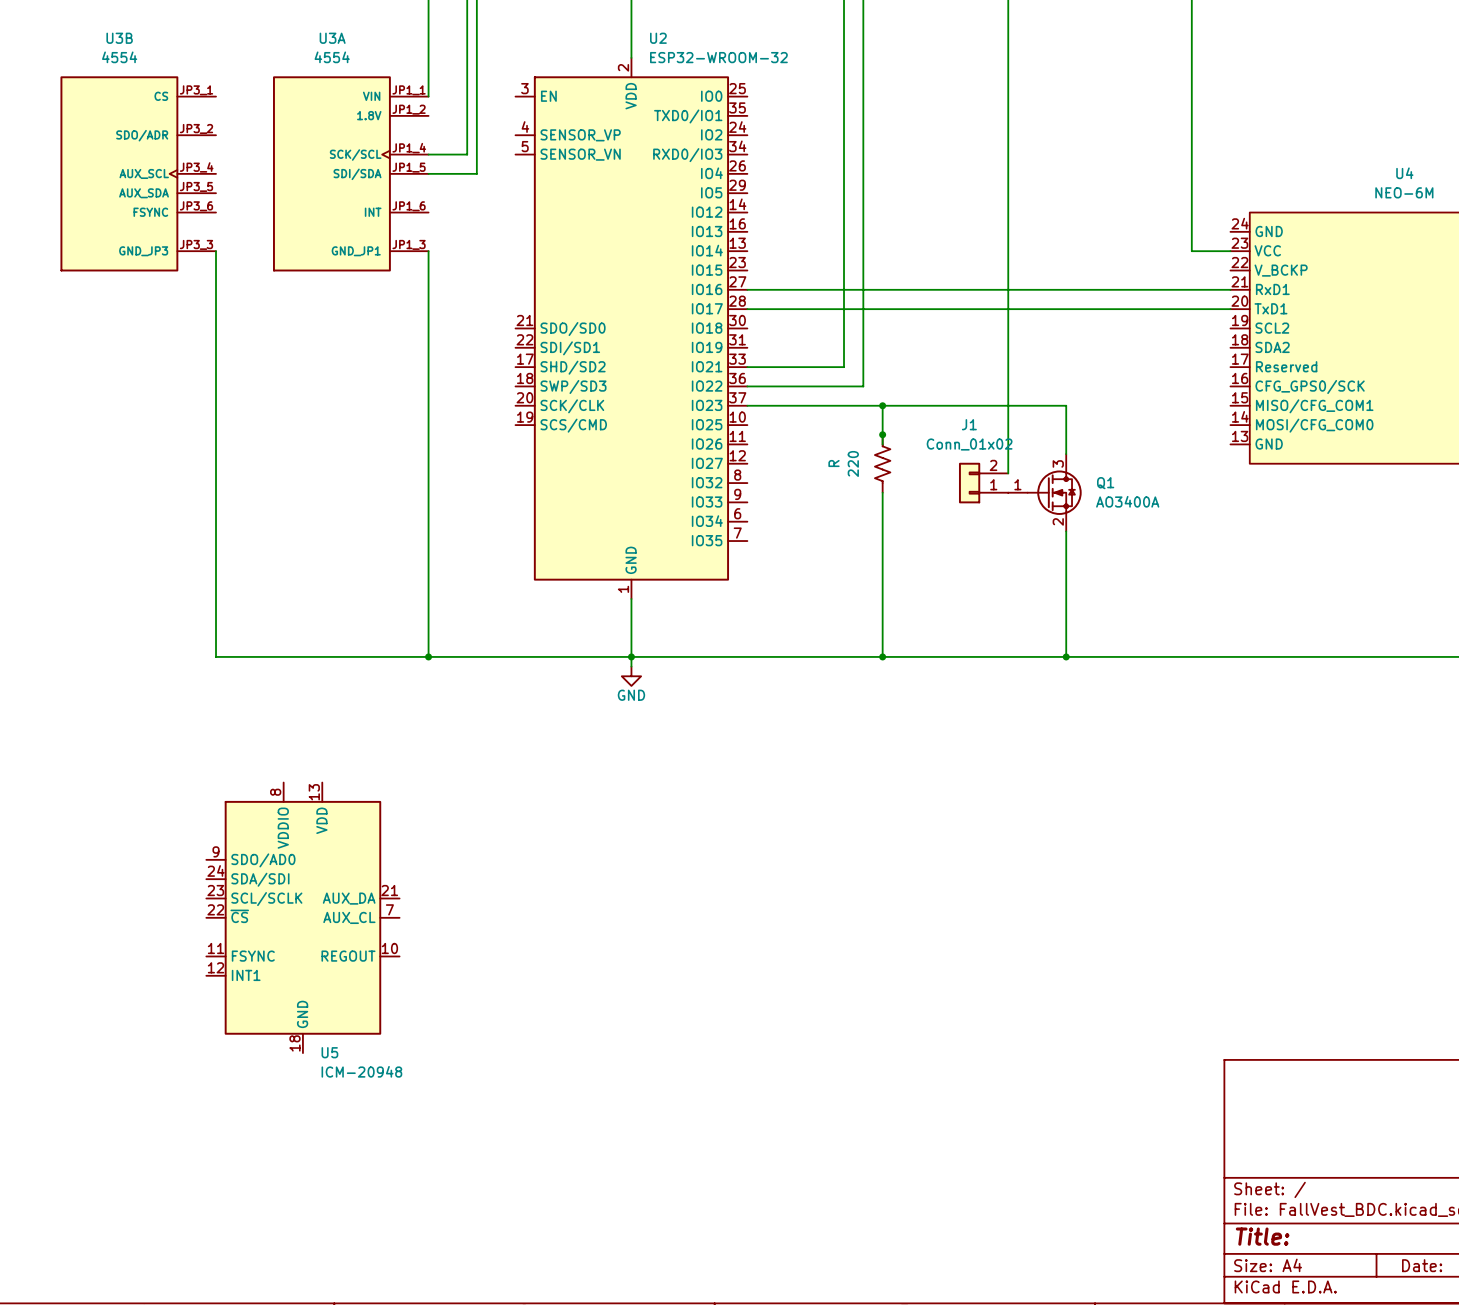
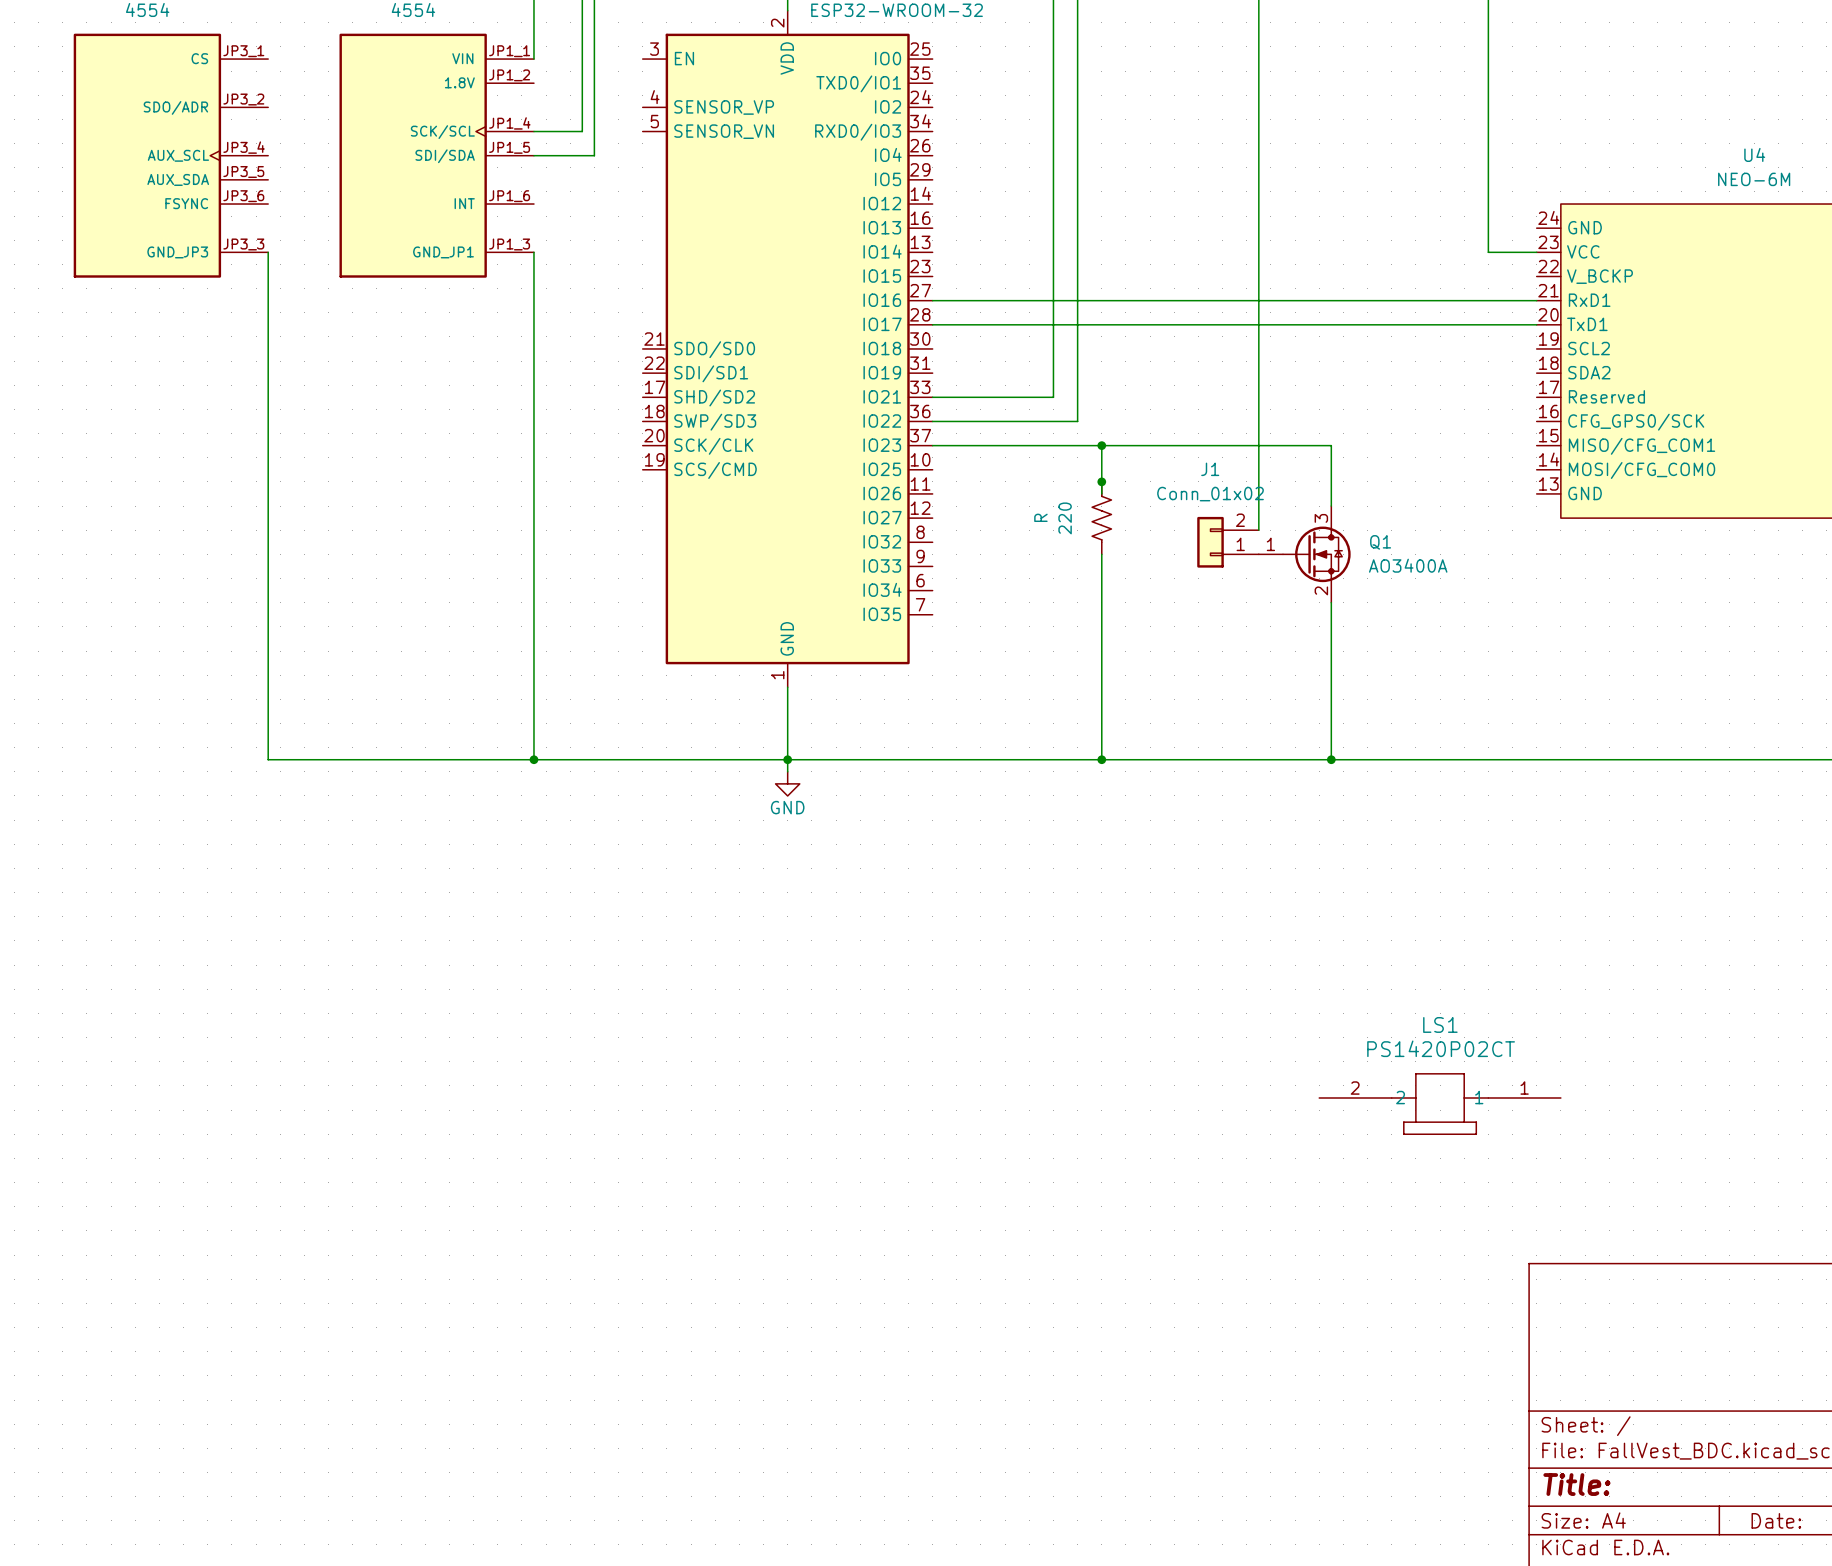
U5: ICM-20948 (302, 917) -> none
LS1: none -> PS1420P02CT (1440, 1104)

